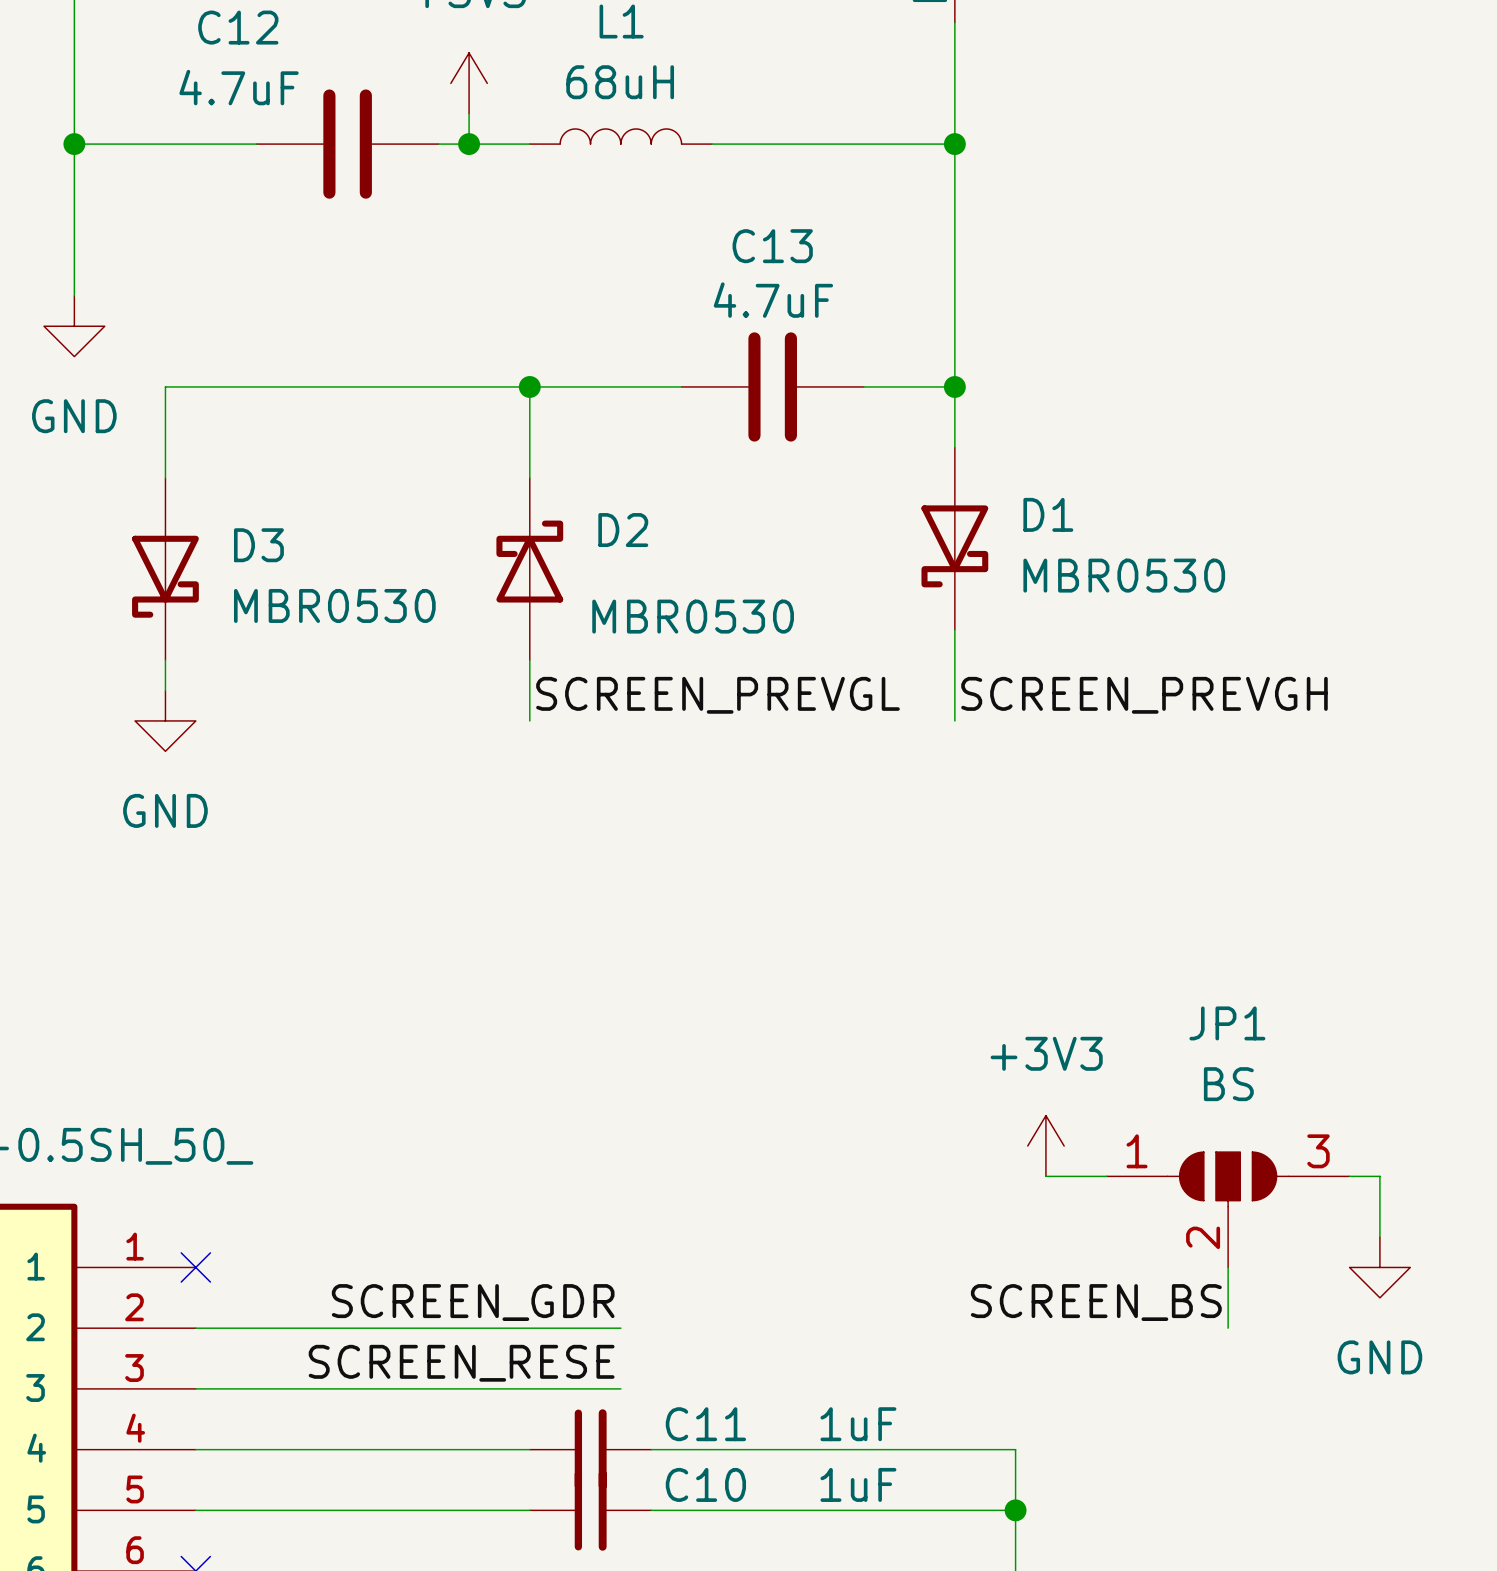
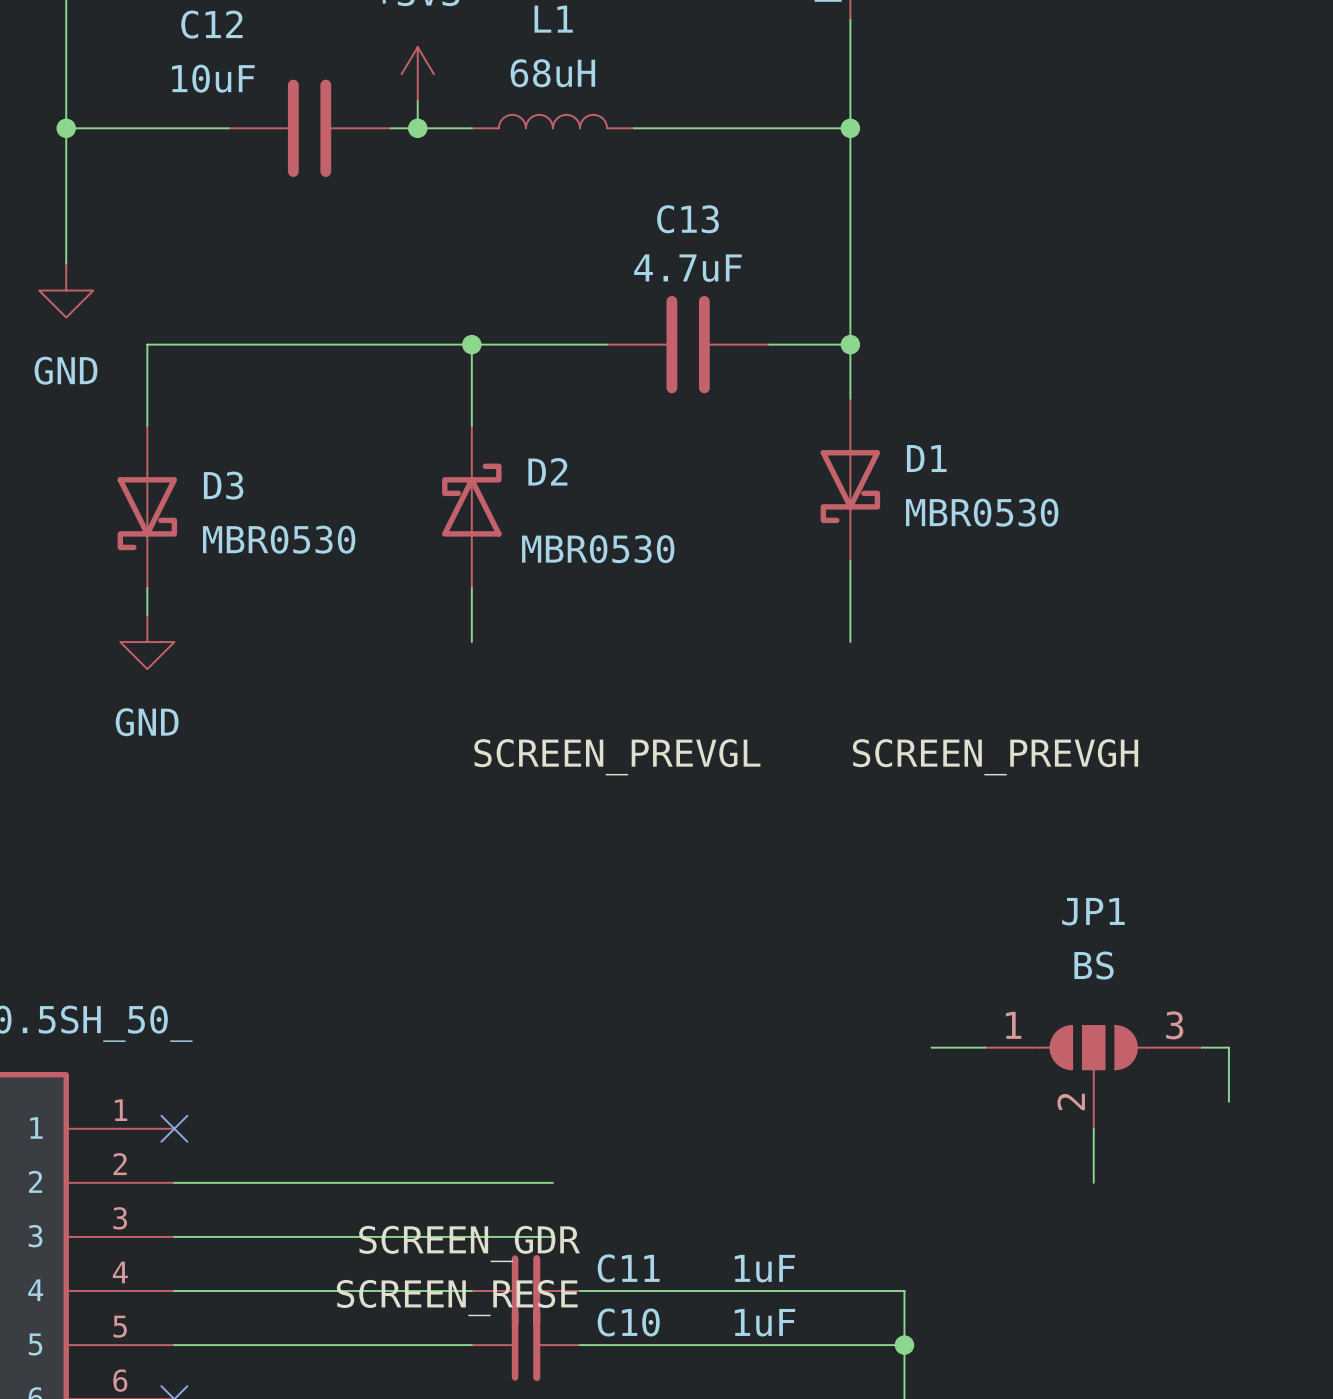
C12 value: 4.7uF (239, 87) -> 10uF (213, 78)
label position: SCREEN_PREVGL (717, 695) -> SCREEN_PREVGL (617, 757)
label position: SCREEN_PREVGH (1144, 695) -> SCREEN_PREVGH (995, 757)
power symbol: +3V3 (1045, 1146) -> none
power symbol: GND (1379, 1267) -> none
label position: SCREEN_GDR (473, 1302) -> SCREEN_GDR (469, 1243)
label: SCREEN_BS (1096, 1302) -> none
label position: SCREEN_RESE (461, 1363) -> SCREEN_RESE (457, 1298)

